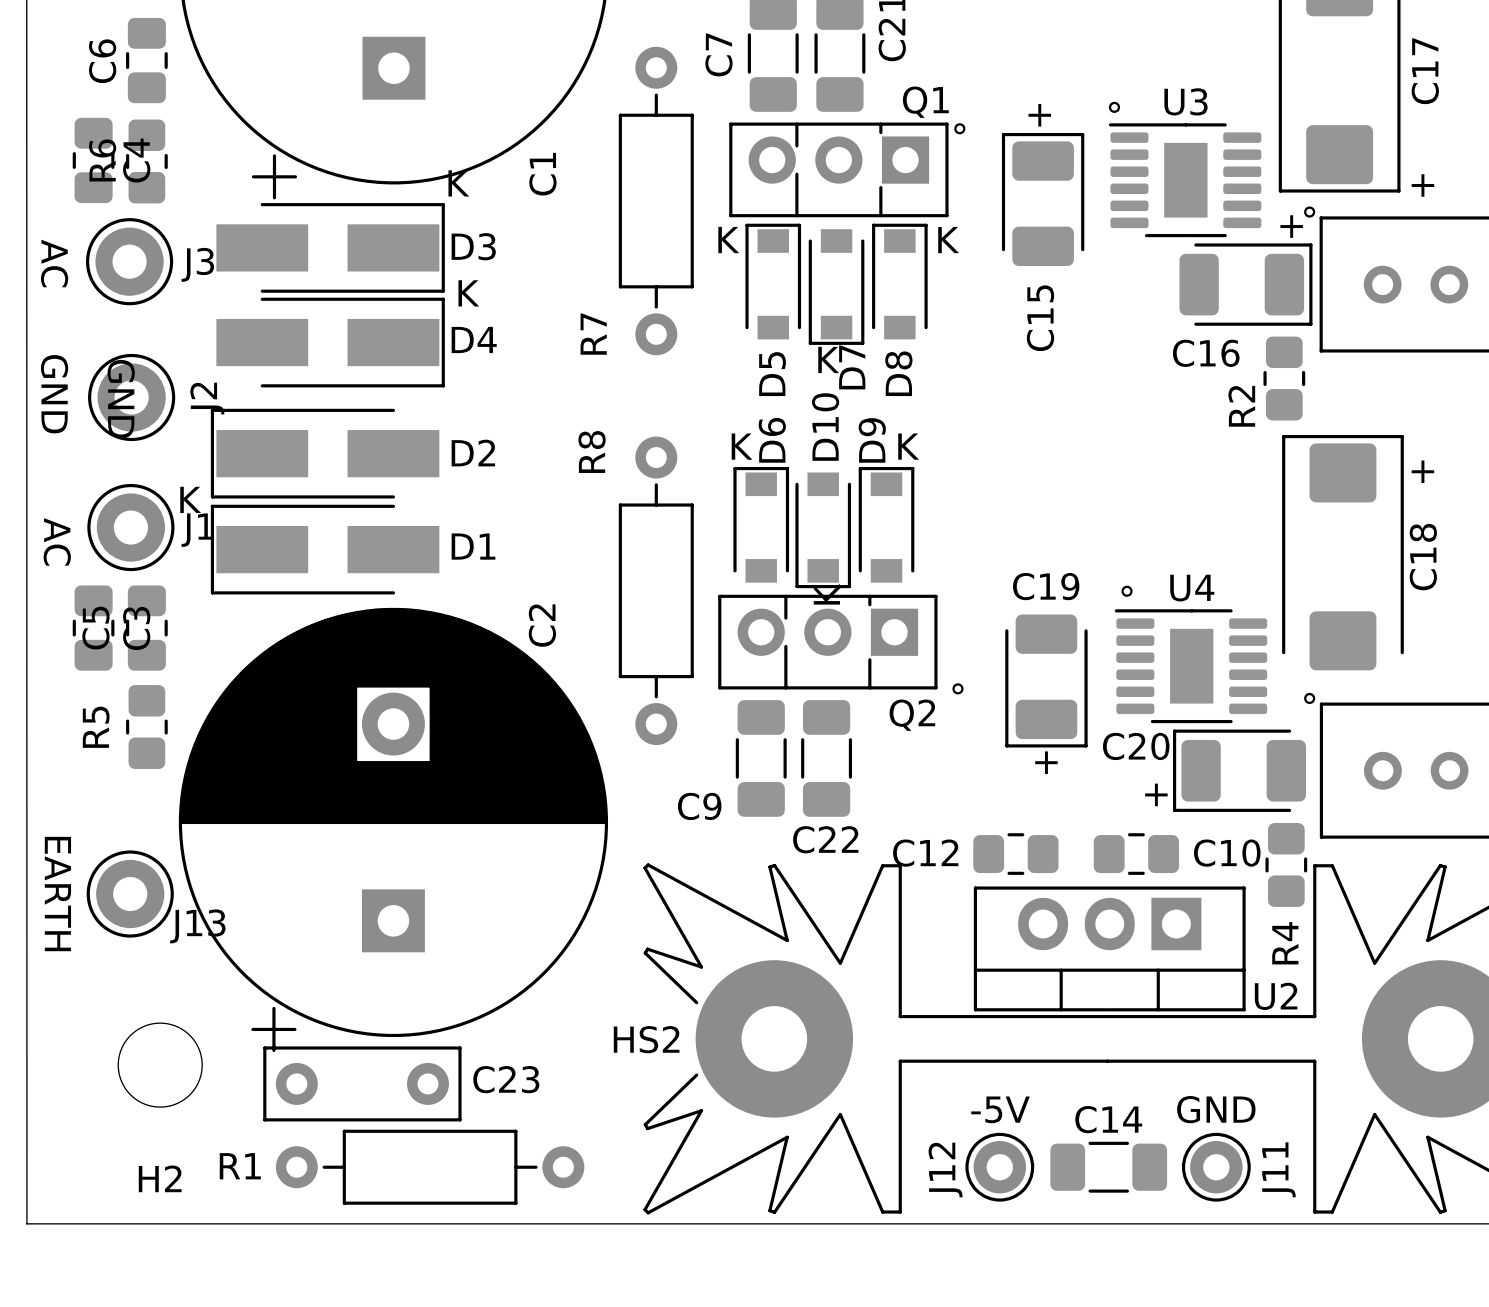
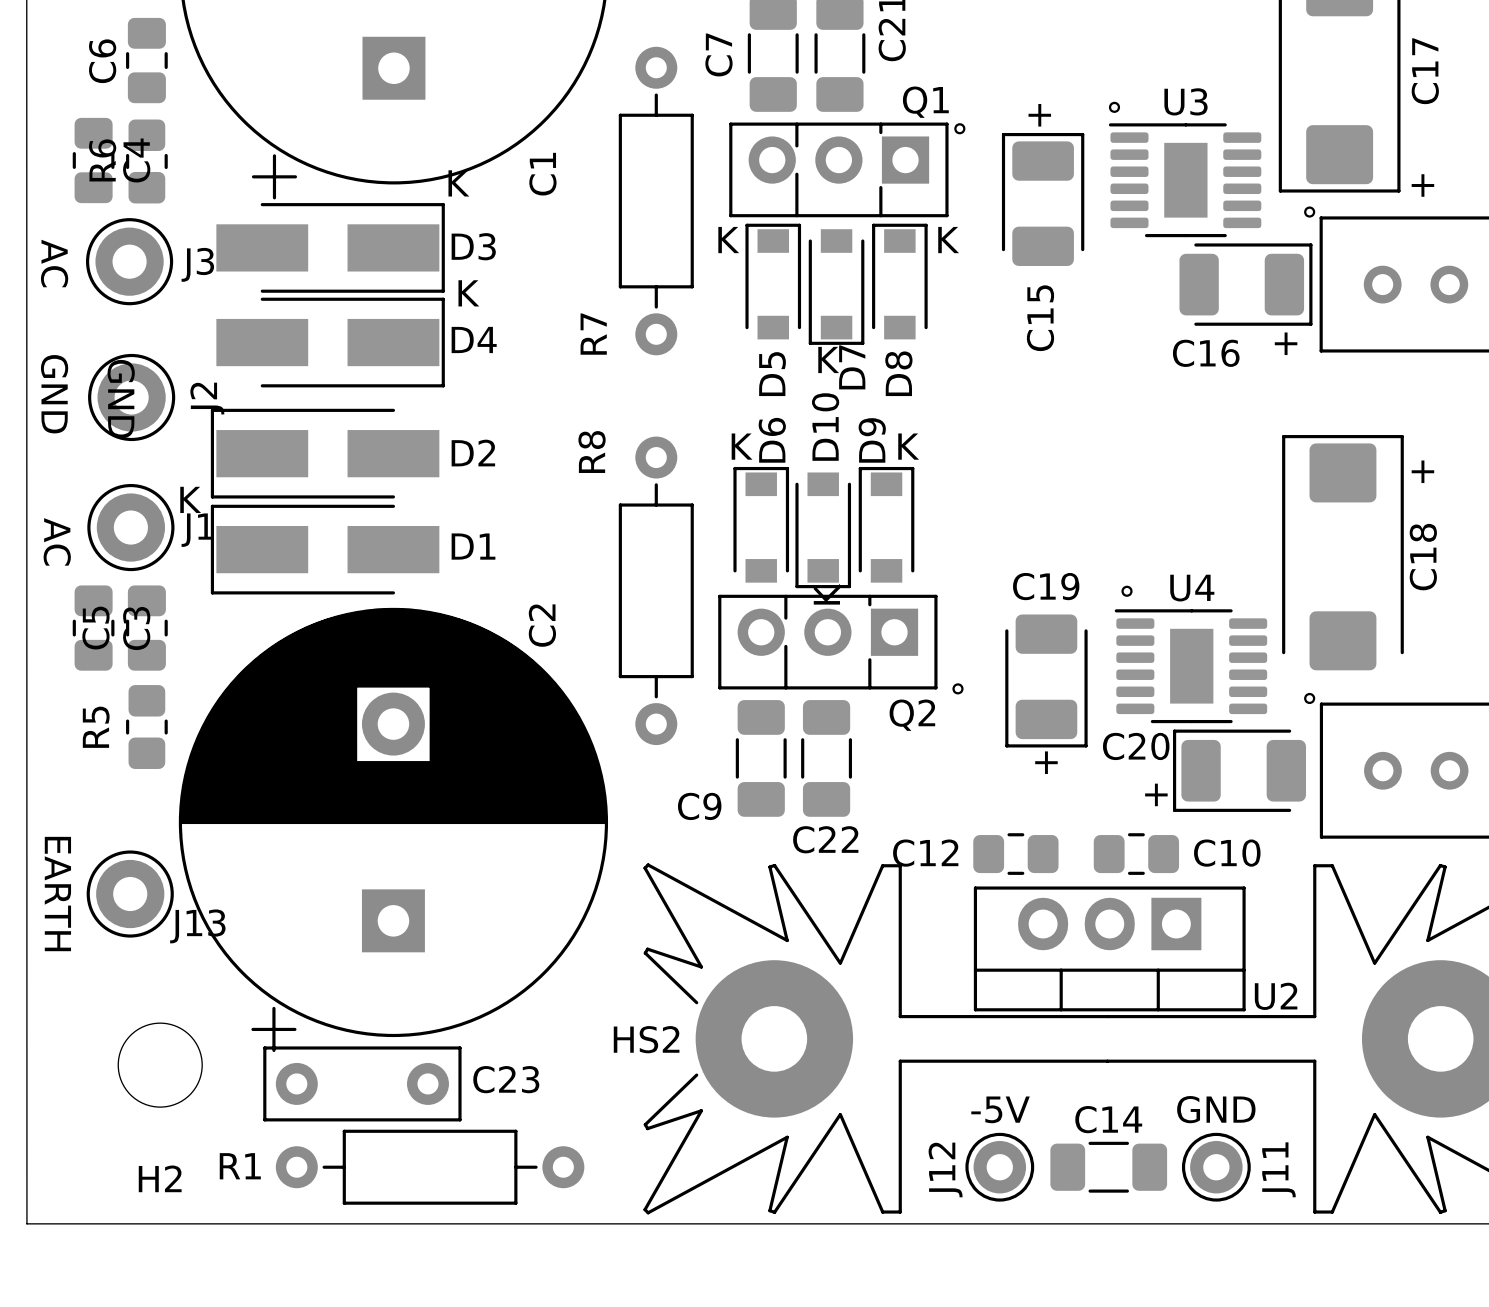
text position: + (1291, 226) -> + (1286, 343)
R2: (1284, 378) -> none
R4: (1286, 864) -> none

